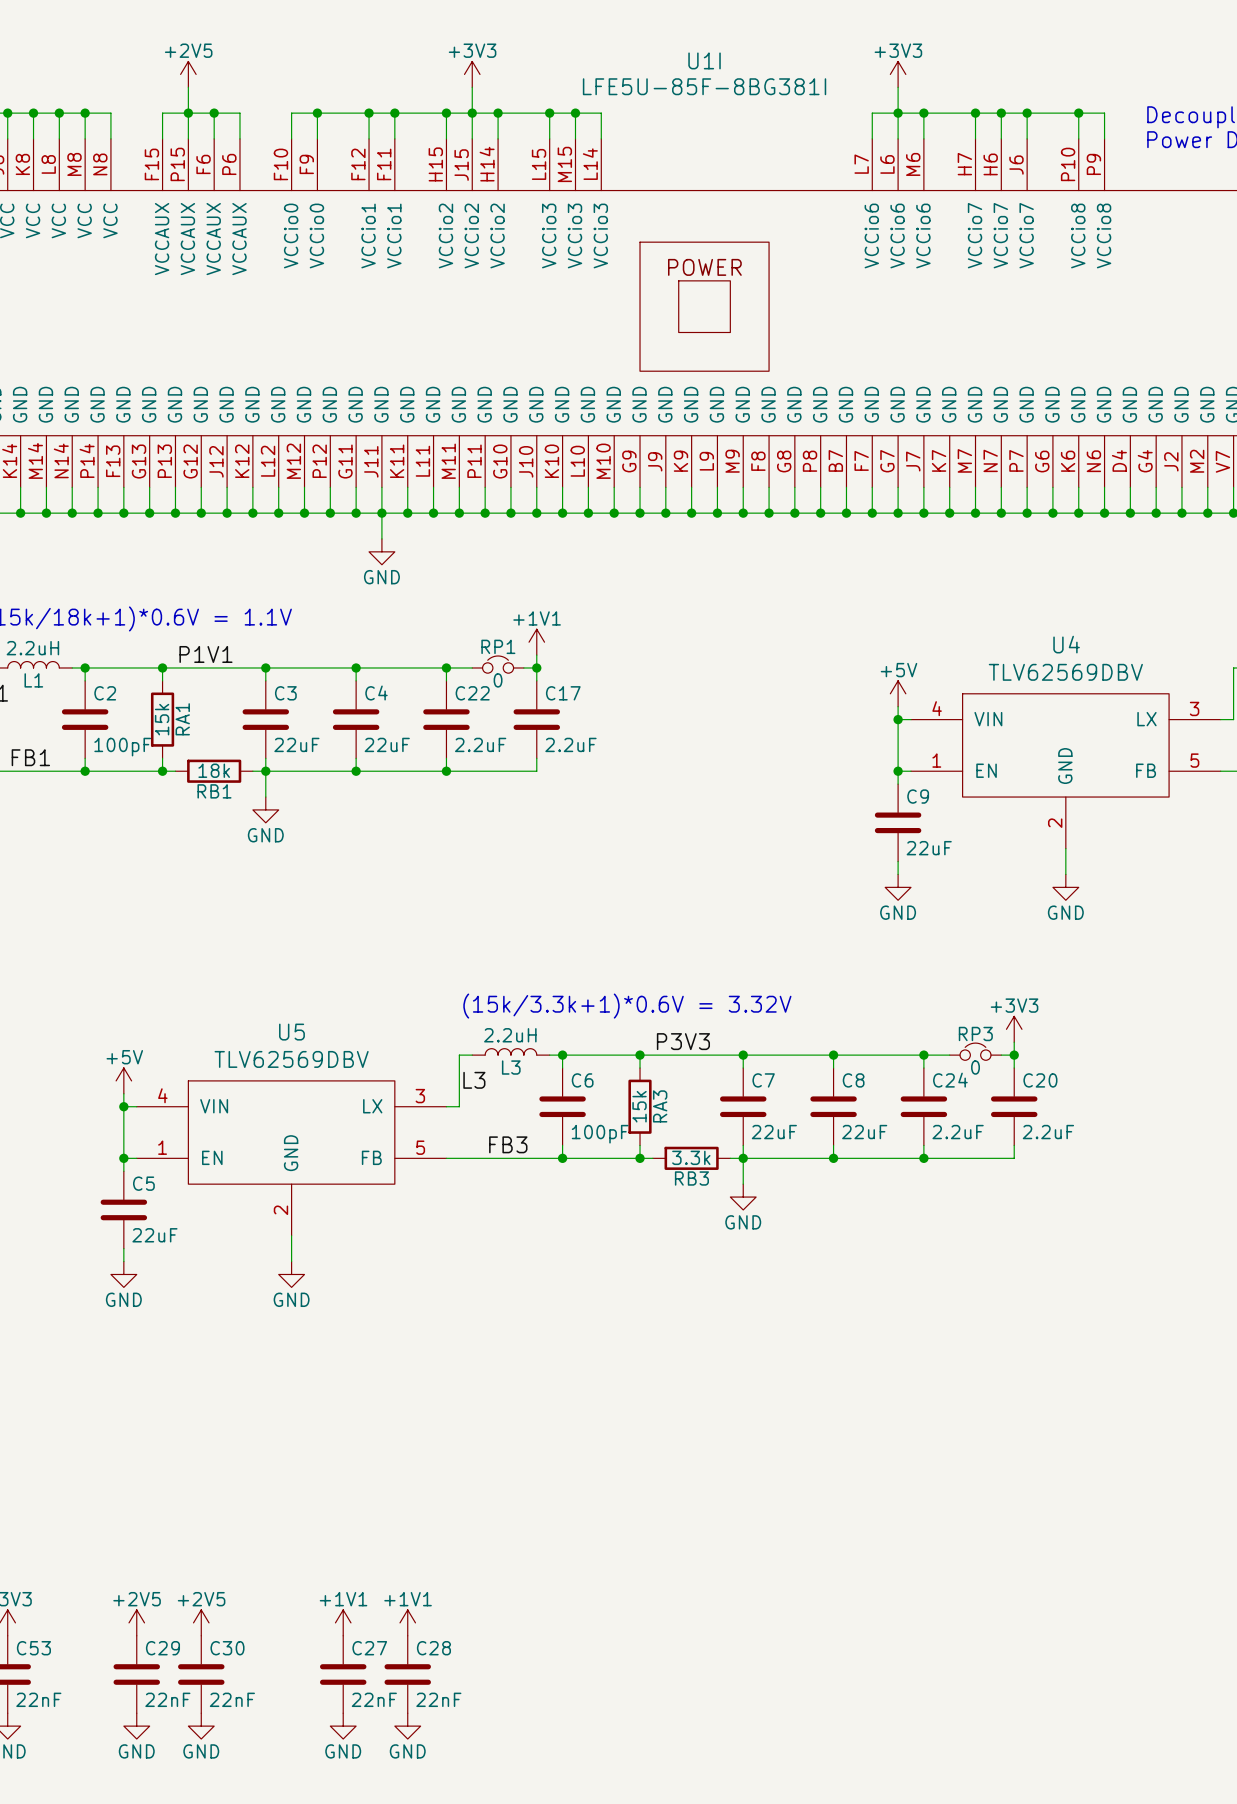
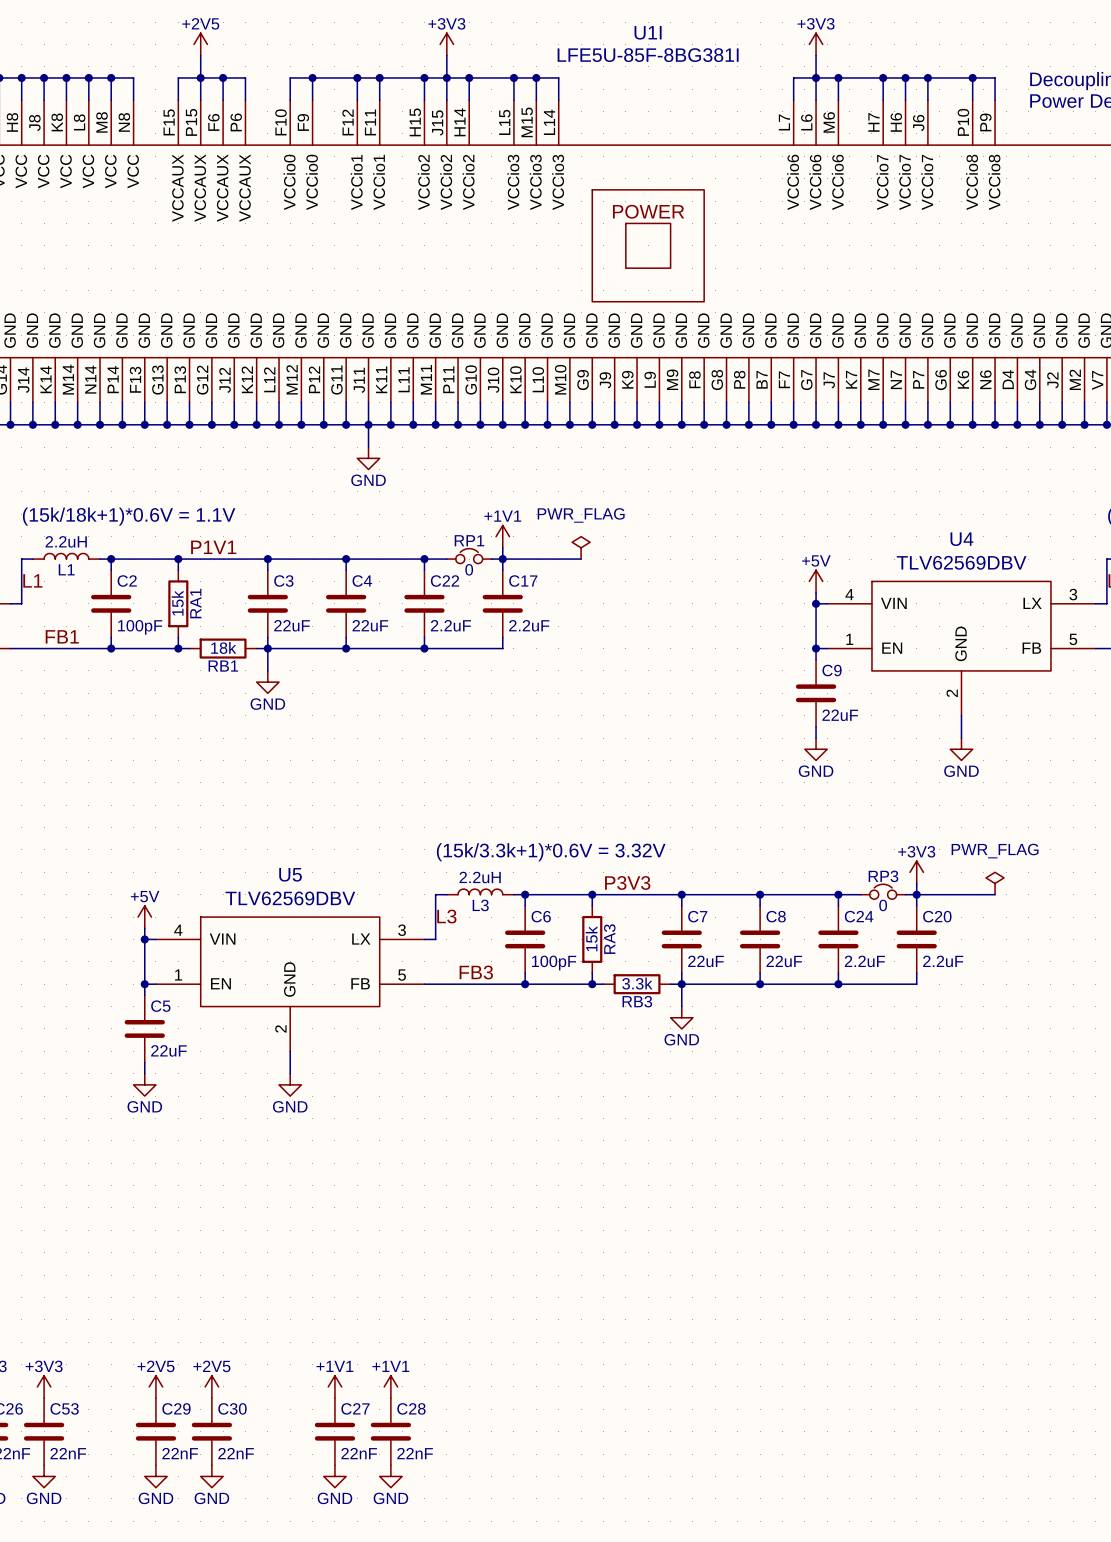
power symbol: none -> PWR_FLAG (581, 547)
wire: none -> (502, 559) (581, 559)
power symbol: none -> PWR_FLAG (995, 883)
wire: none -> (916, 894) (995, 894)

